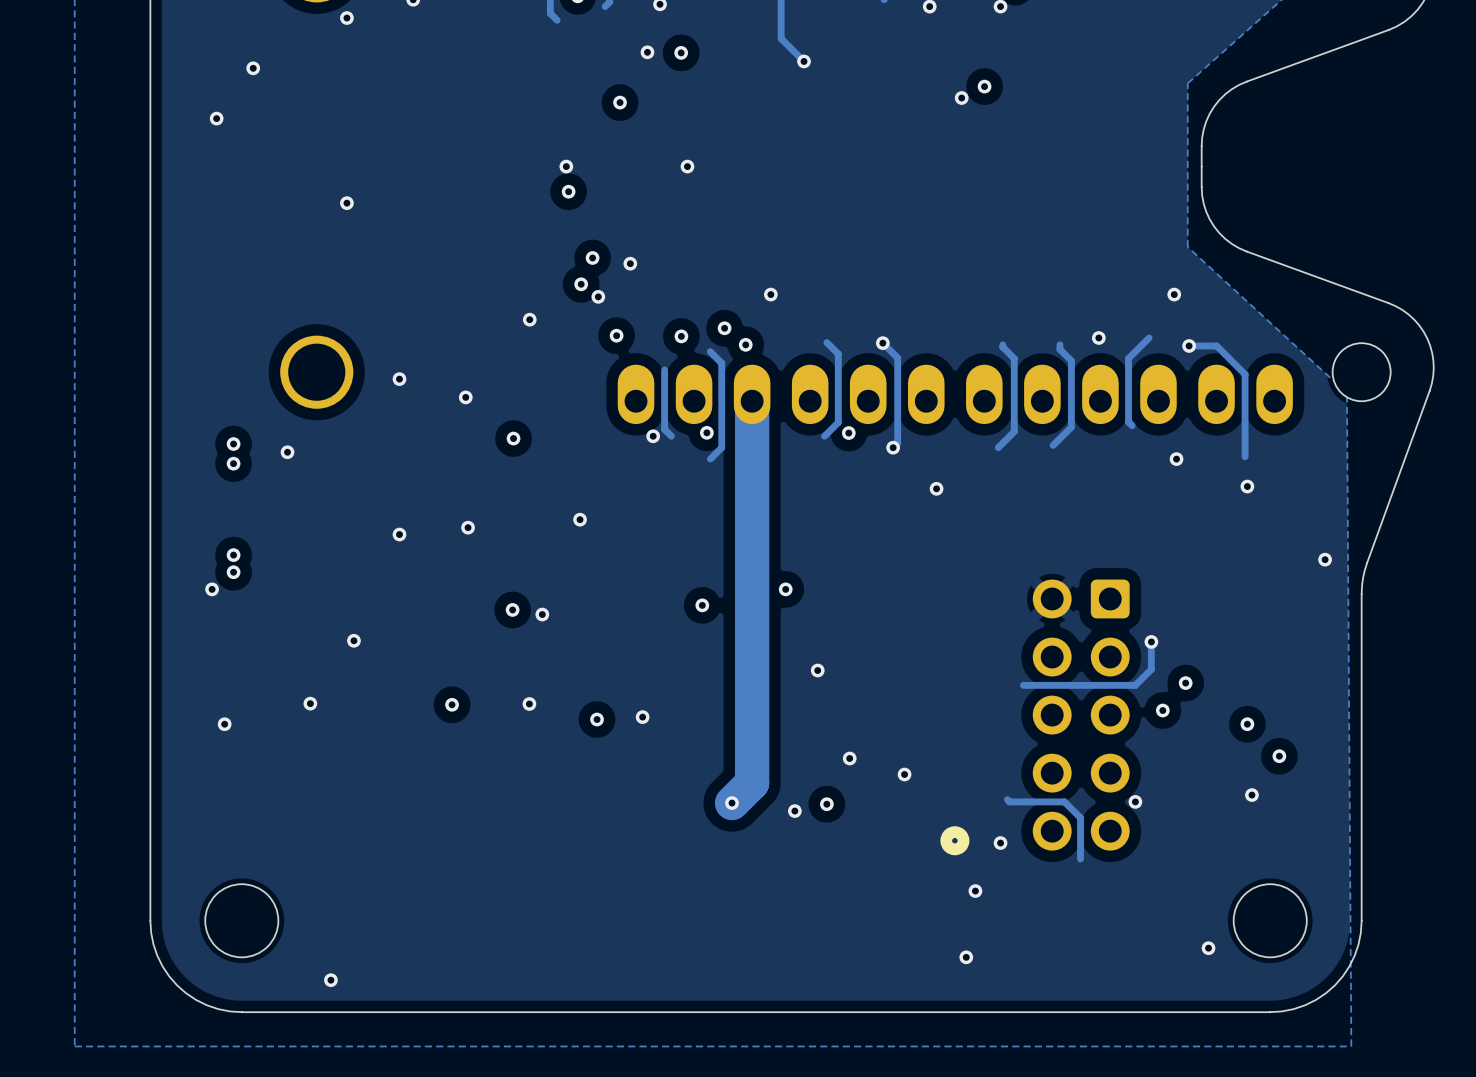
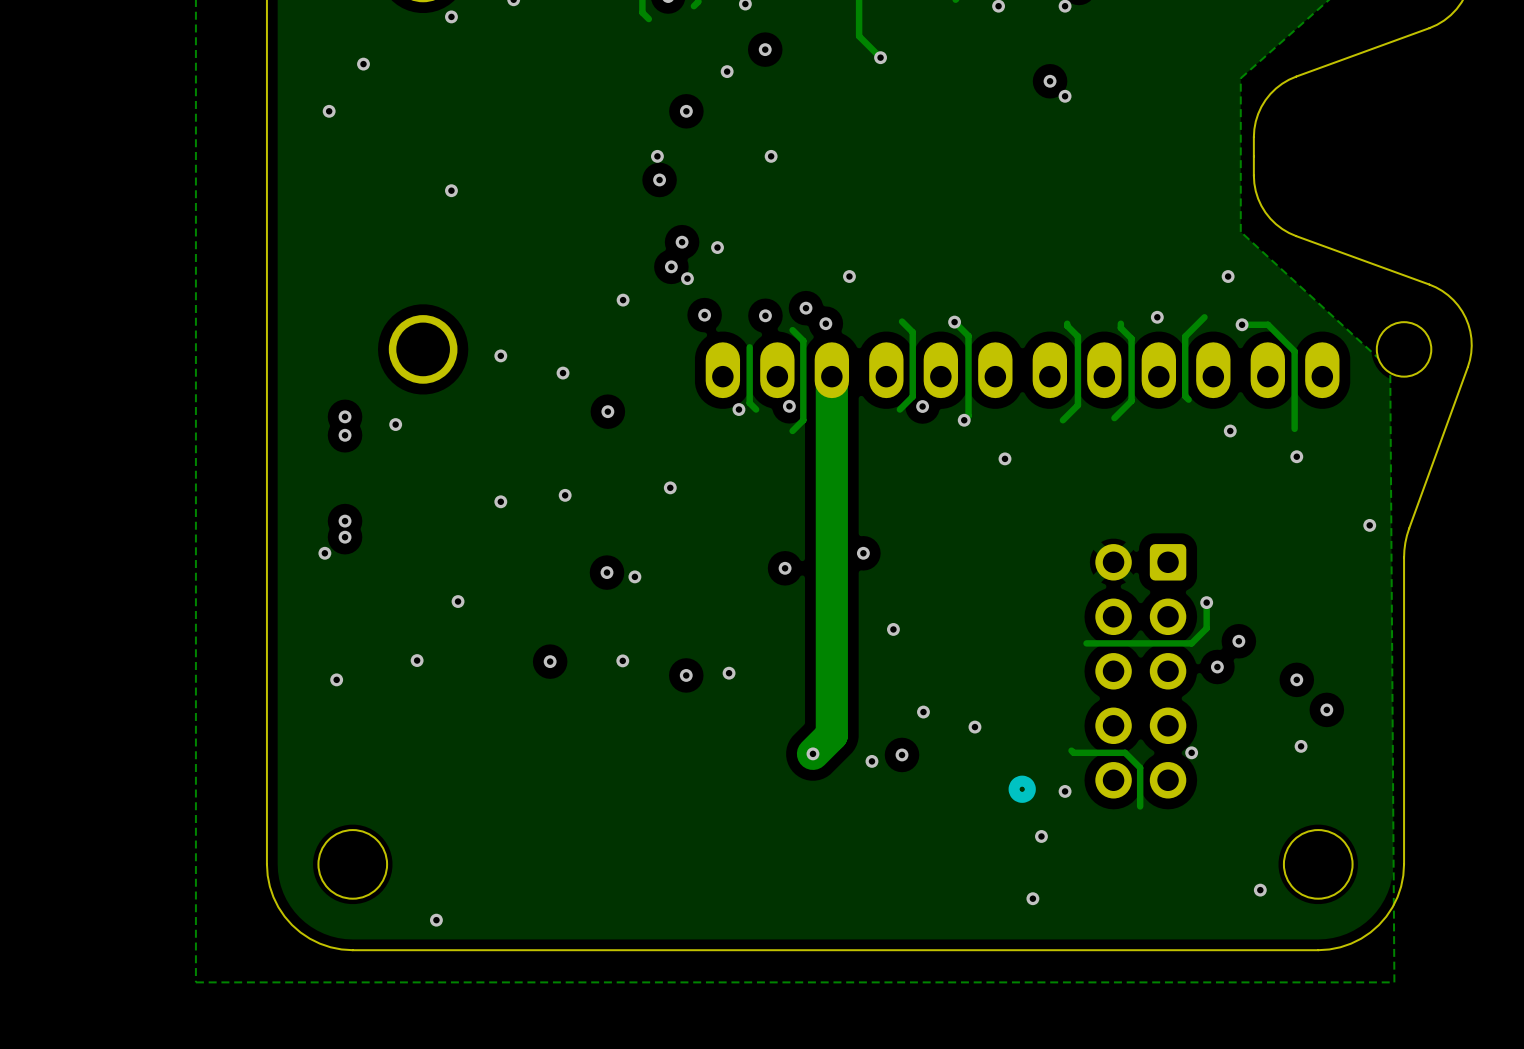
via: (647, 52) -> none
via: none -> (727, 71)
via position: (961, 98) -> (1065, 96)
via: (620, 102) -> none
via: none -> (686, 111)

